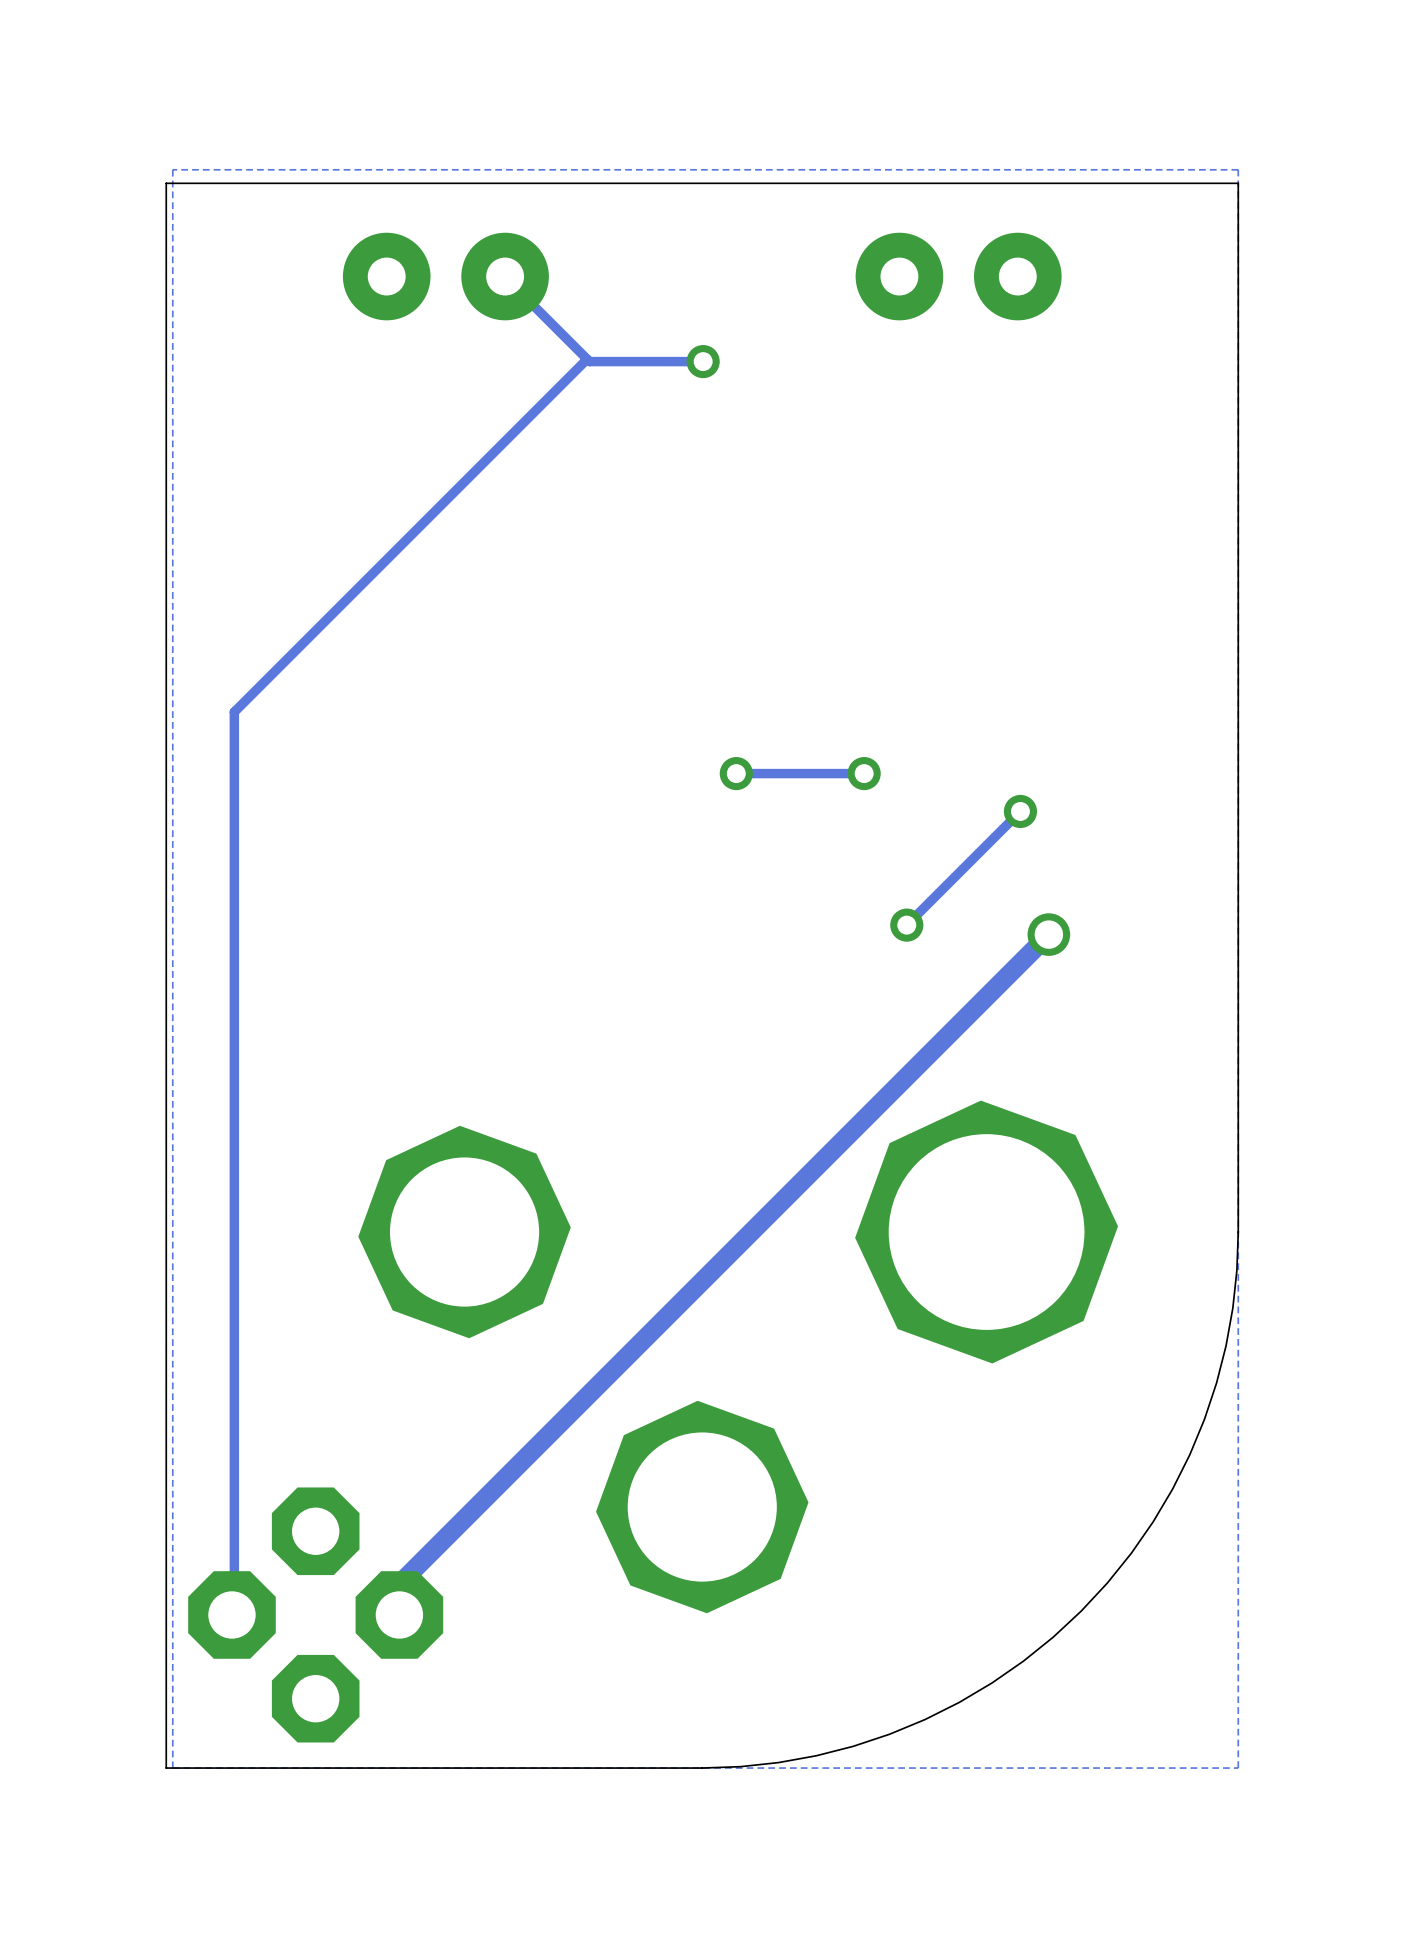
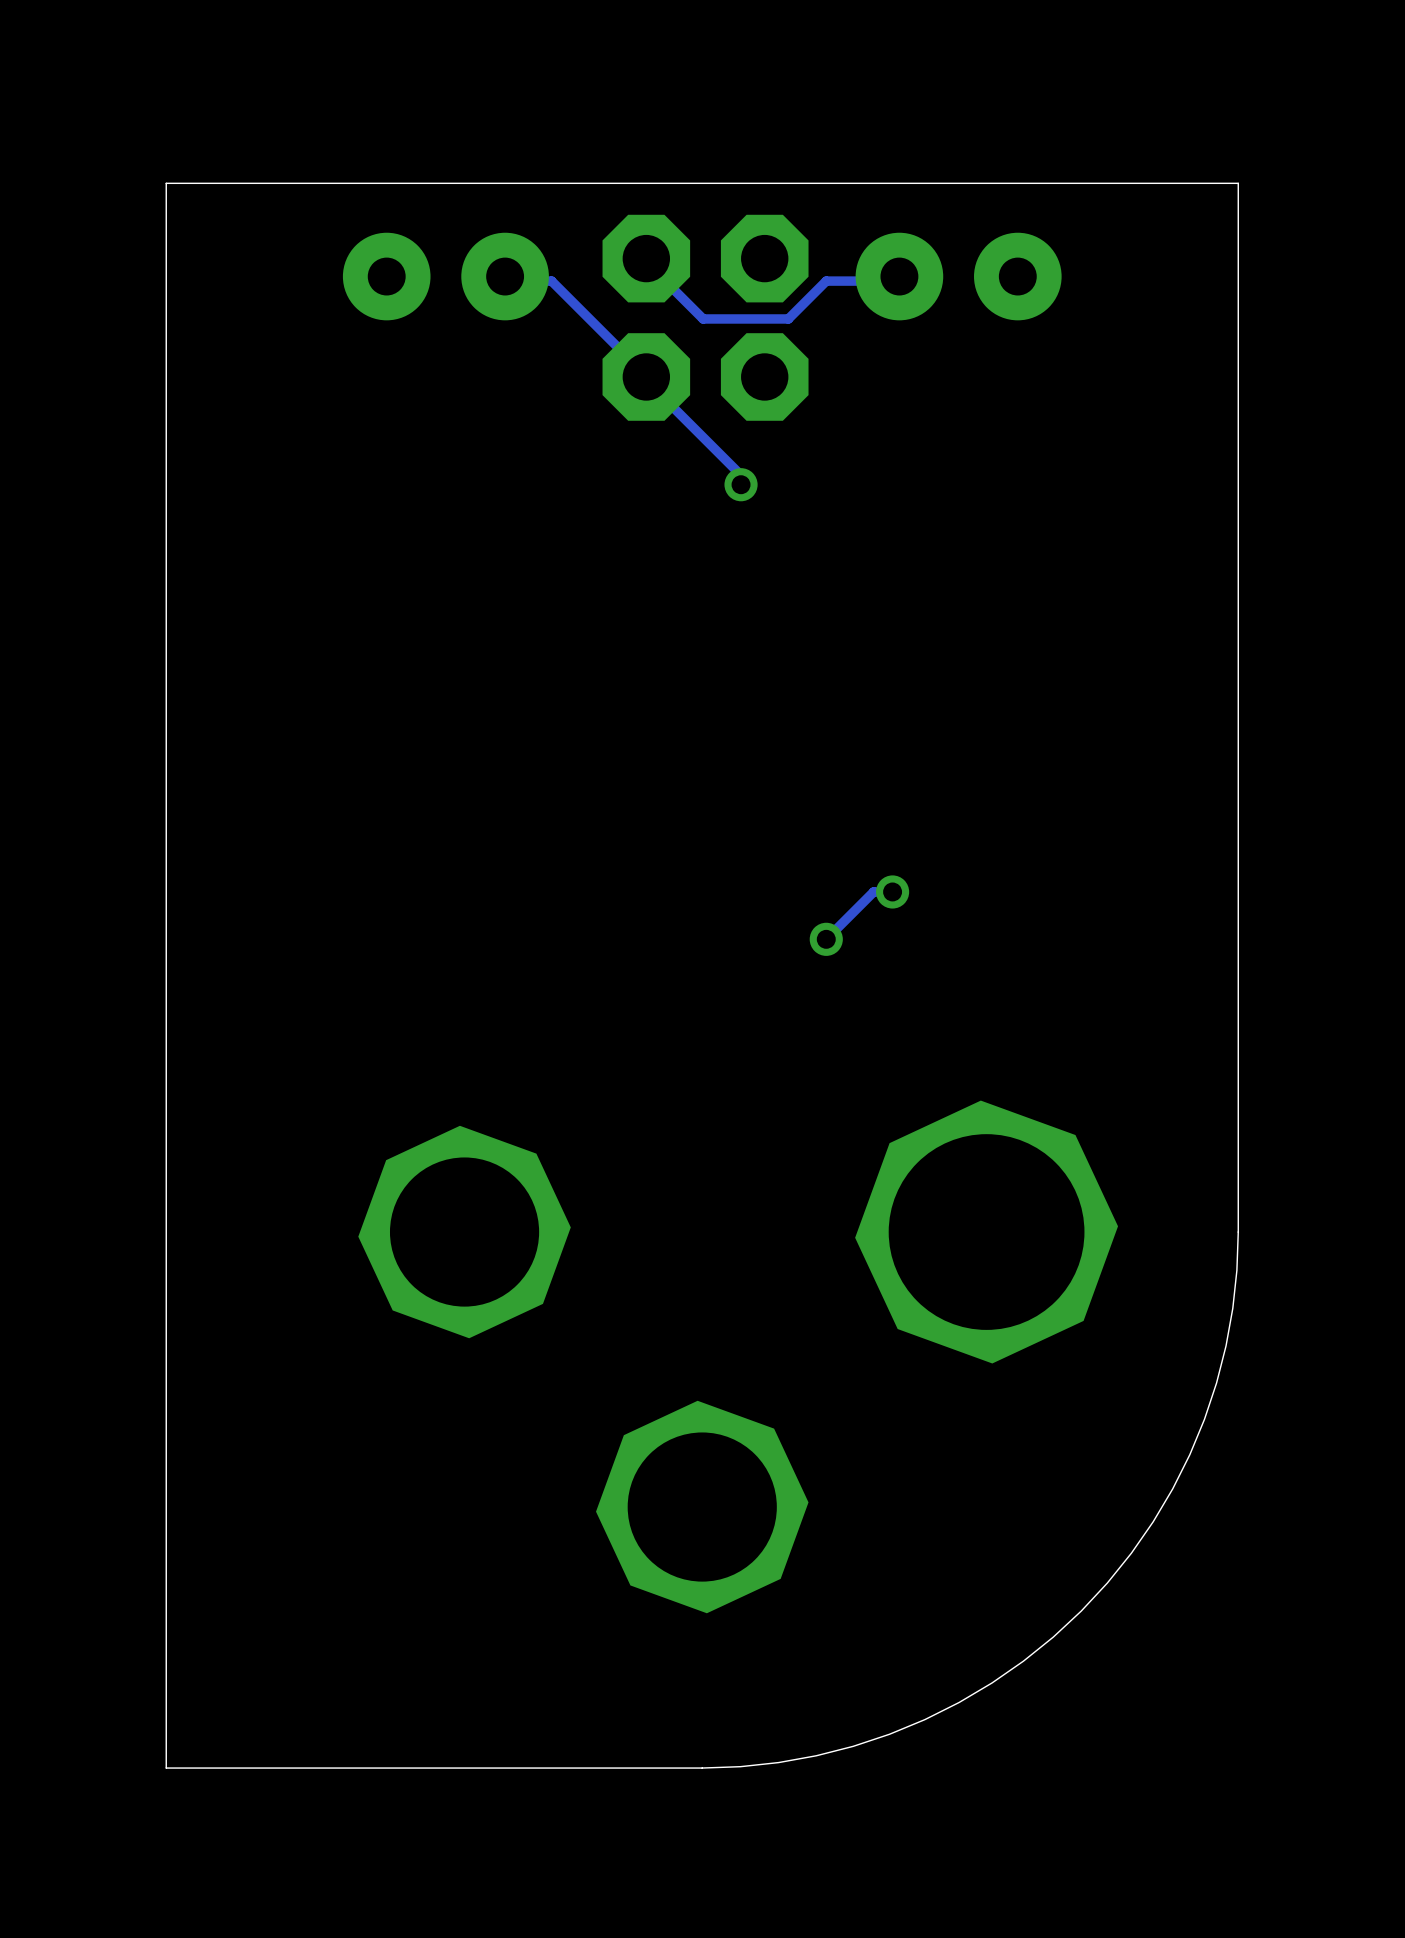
zone outline: (1238, 169) (172, 169) (172, 1768) (1238, 1768) (1238, 169) -> none
track: none -> (646, 258) (646, 262) (703, 318) (788, 318) (826, 281) (897, 281) (899, 276)
track: (509, 281) (589, 361) (703, 361) -> (509, 281) (551, 281) (646, 375) (646, 380) (741, 475) (741, 484)
part: none -> (705, 317)
track: (587, 359) (234, 712) (234, 1611) (231, 1614) -> none
via position: (703, 361) -> (741, 484)
via: (736, 773) -> none
track: (864, 773) (736, 773) -> none
via: (864, 773) -> none
track: (1020, 811) (906, 925) -> none
via: (1020, 811) -> none
track: none -> (892, 891) (873, 891) (826, 939)
via position: (906, 925) -> (892, 891)
track: (1048, 934) (400, 1583) (399, 1614) -> none
via: (1048, 934) -> none
via: none -> (826, 939)
part: (315, 1614) -> none

